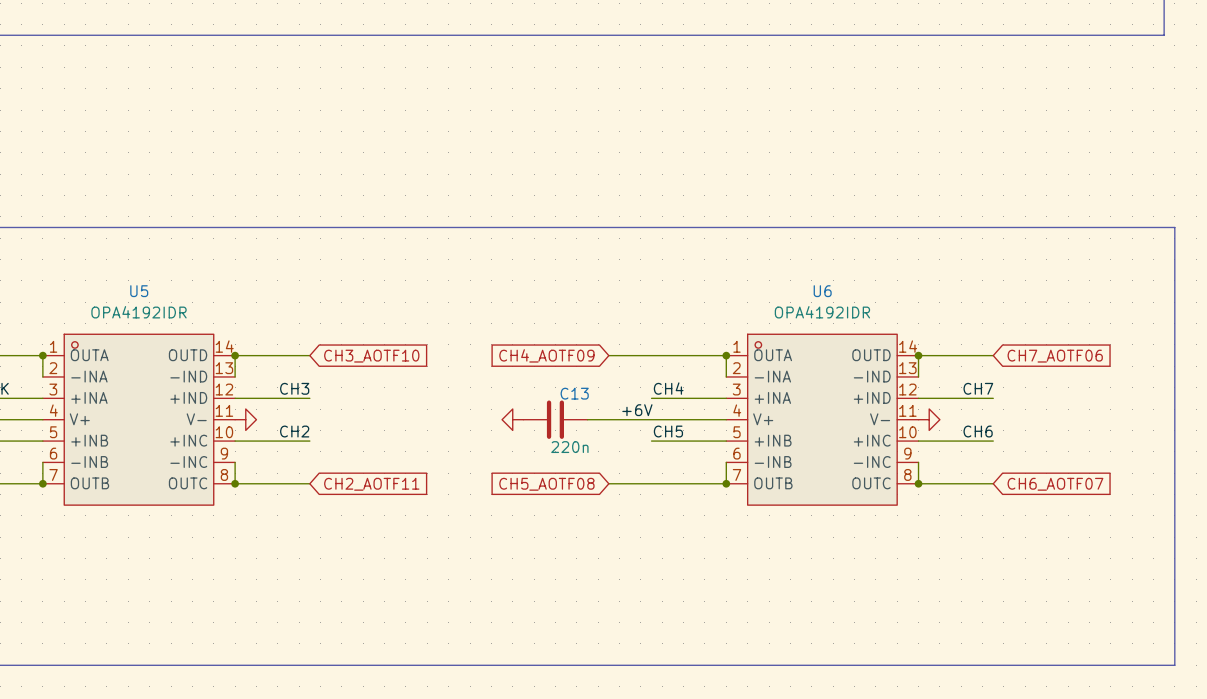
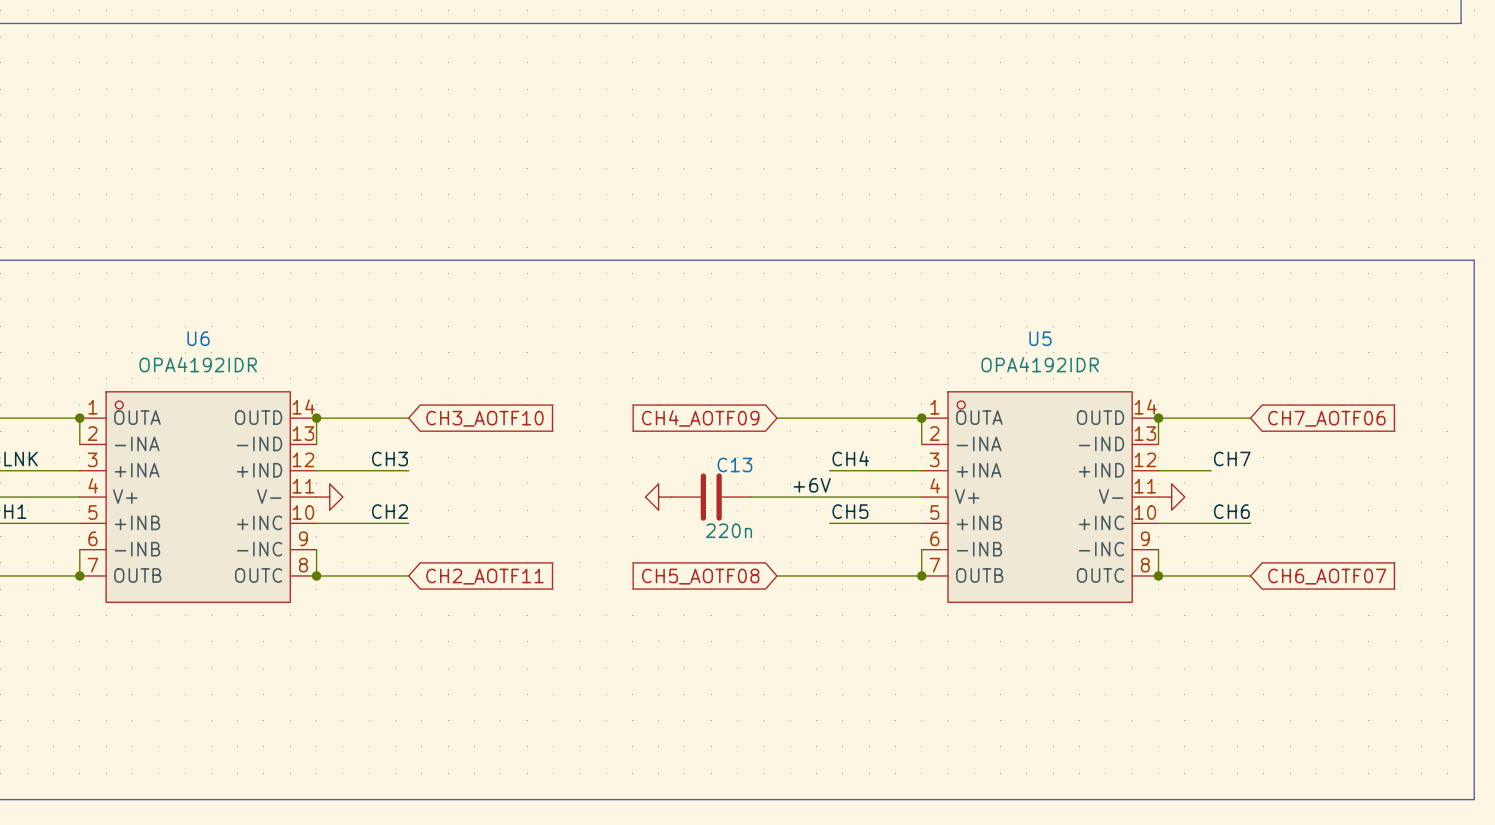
U5 name: U5 (139, 291) -> U6 (198, 338)
U6 name: U6 (822, 291) -> U5 (1040, 338)
wire: (961, 398) (993, 398) -> none

